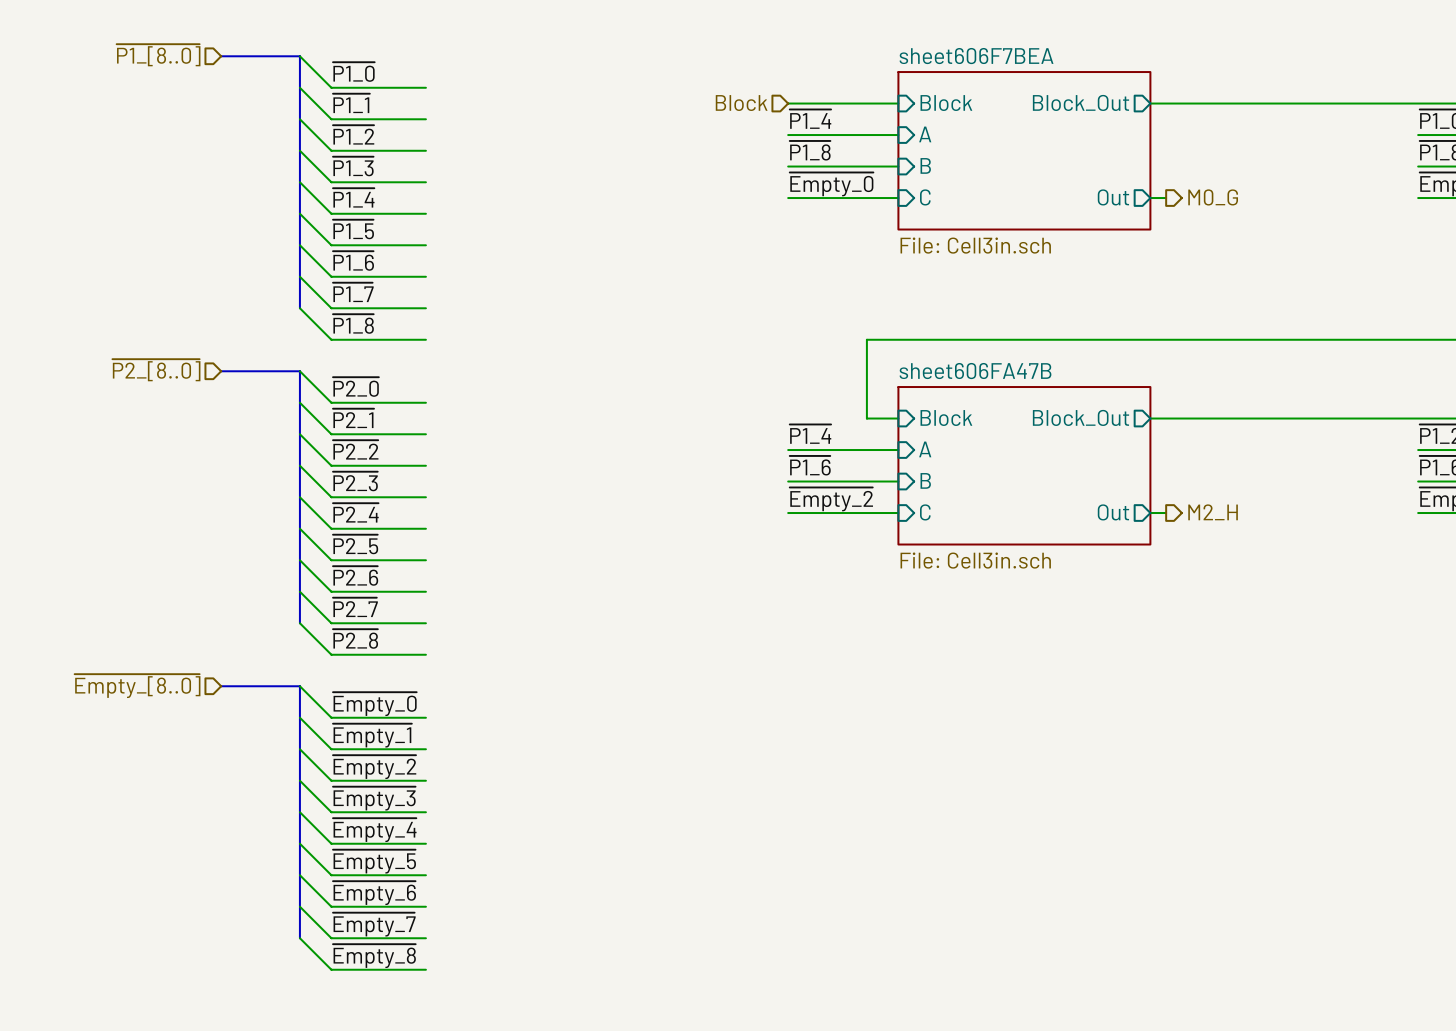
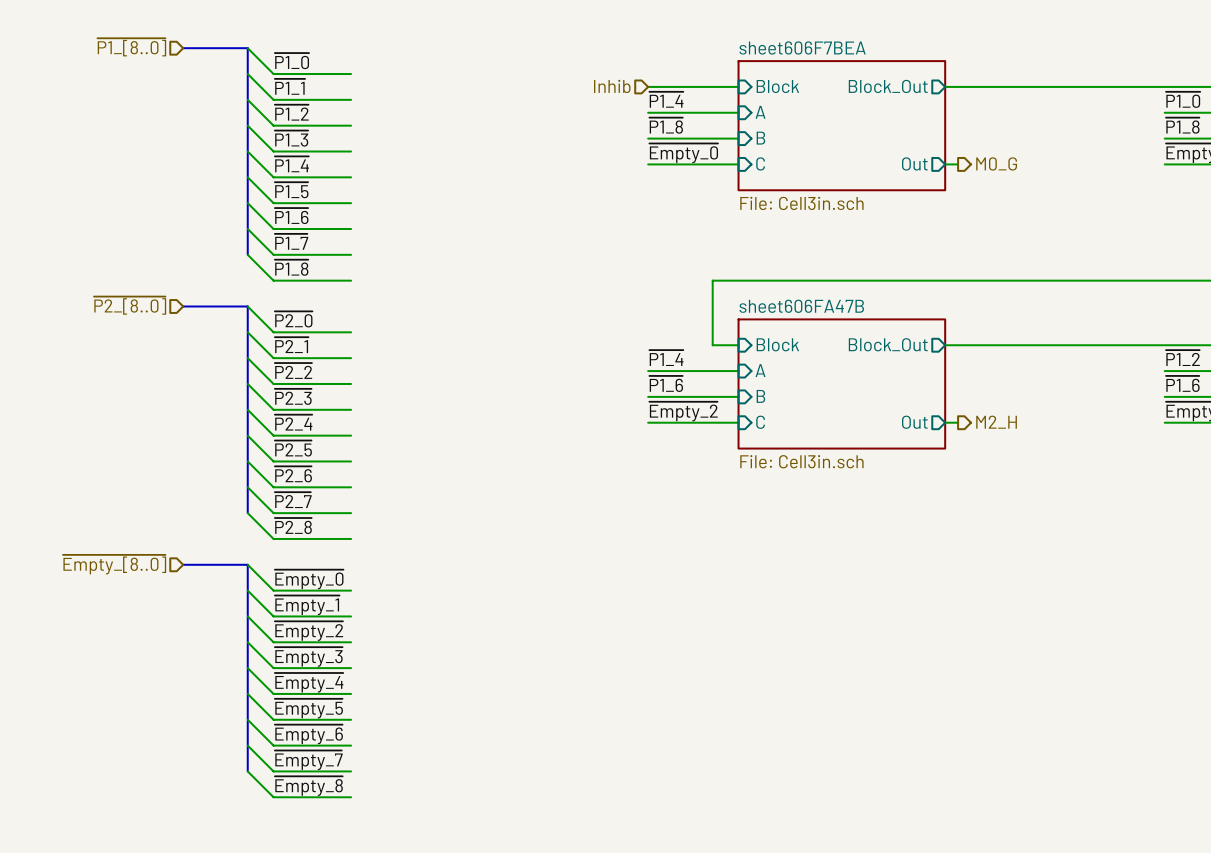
hierarchical label: Block (741, 103) -> Inhib (612, 86)

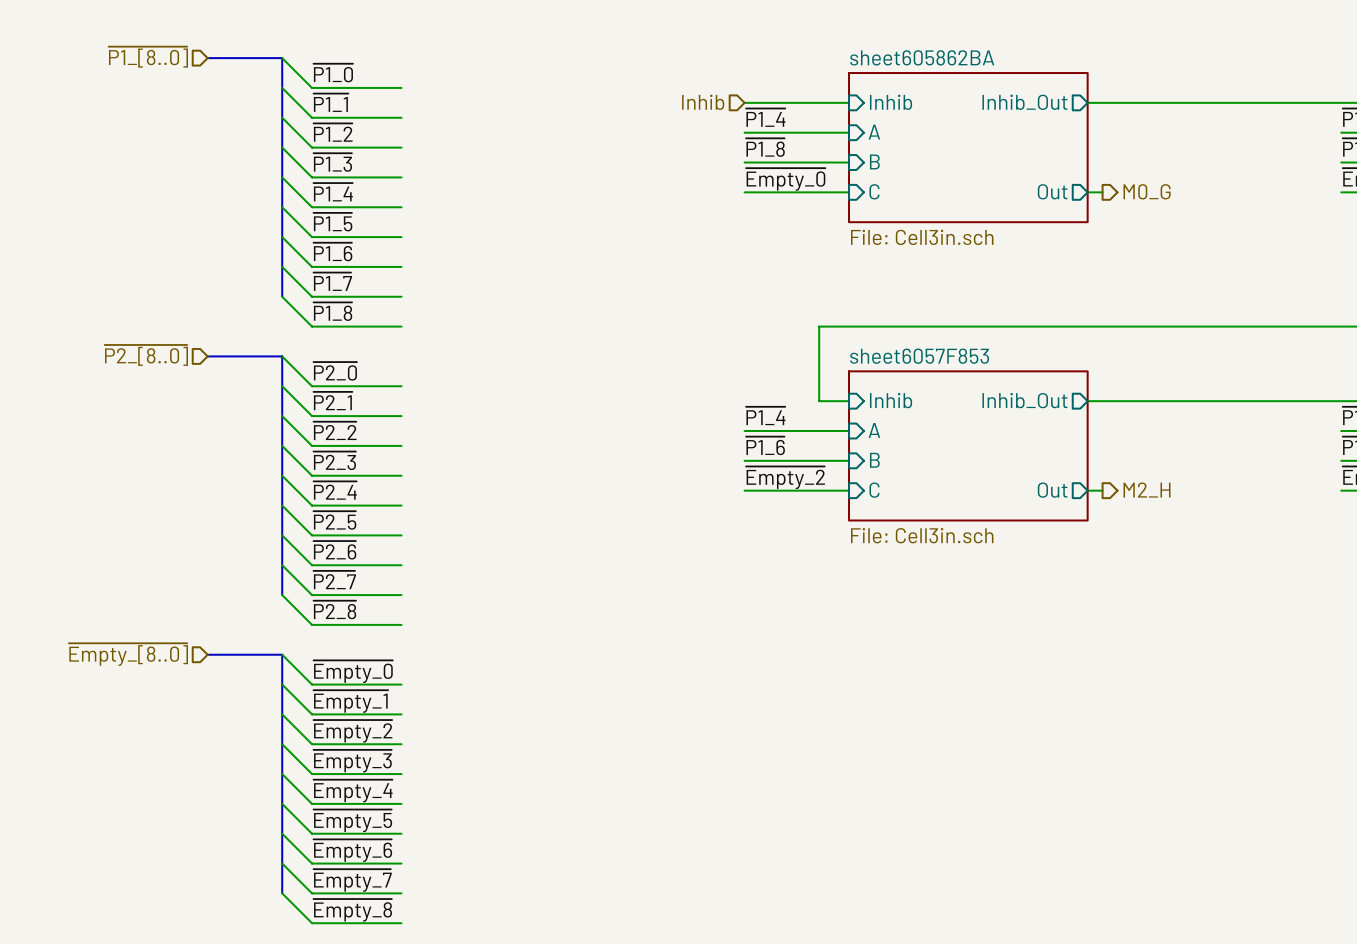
sheet sheet606F7BEA name: sheet606F7BEA (802, 47) -> sheet605862BA (922, 57)
sheet pin: Block (777, 86) -> Inhib (891, 102)
sheet pin: Block_Out (888, 86) -> Inhib_Out (1024, 102)
sheet sheet606FA47B name: sheet606FA47B (801, 306) -> sheet6057F853 (919, 356)
sheet pin: Block (777, 344) -> Inhib (891, 400)
sheet pin: Block_Out (888, 344) -> Inhib_Out (1024, 400)

